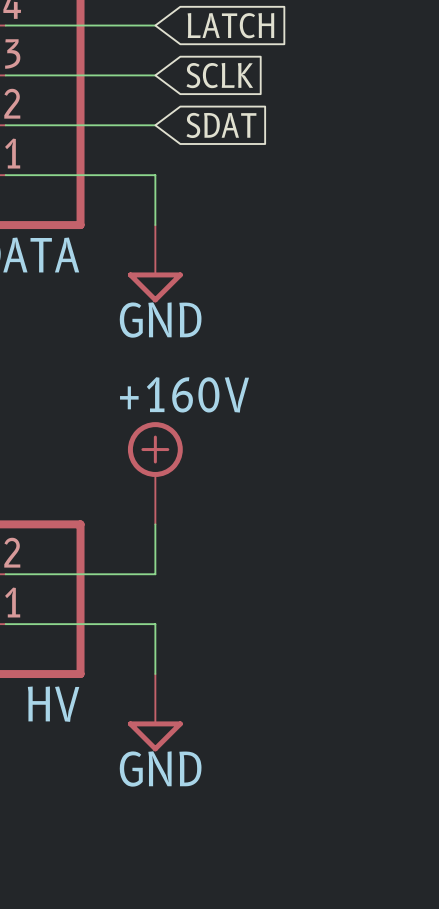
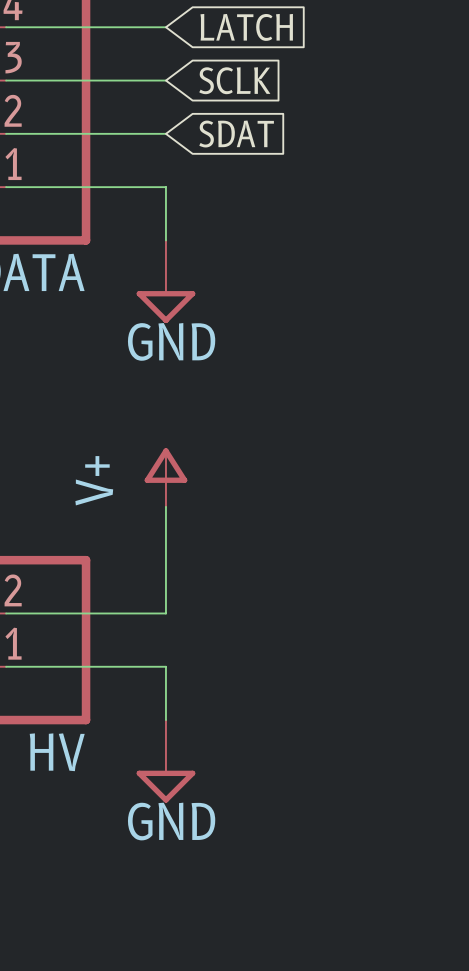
power symbol: none -> V+ (165, 477)
power symbol: +160V (155, 473) -> none

